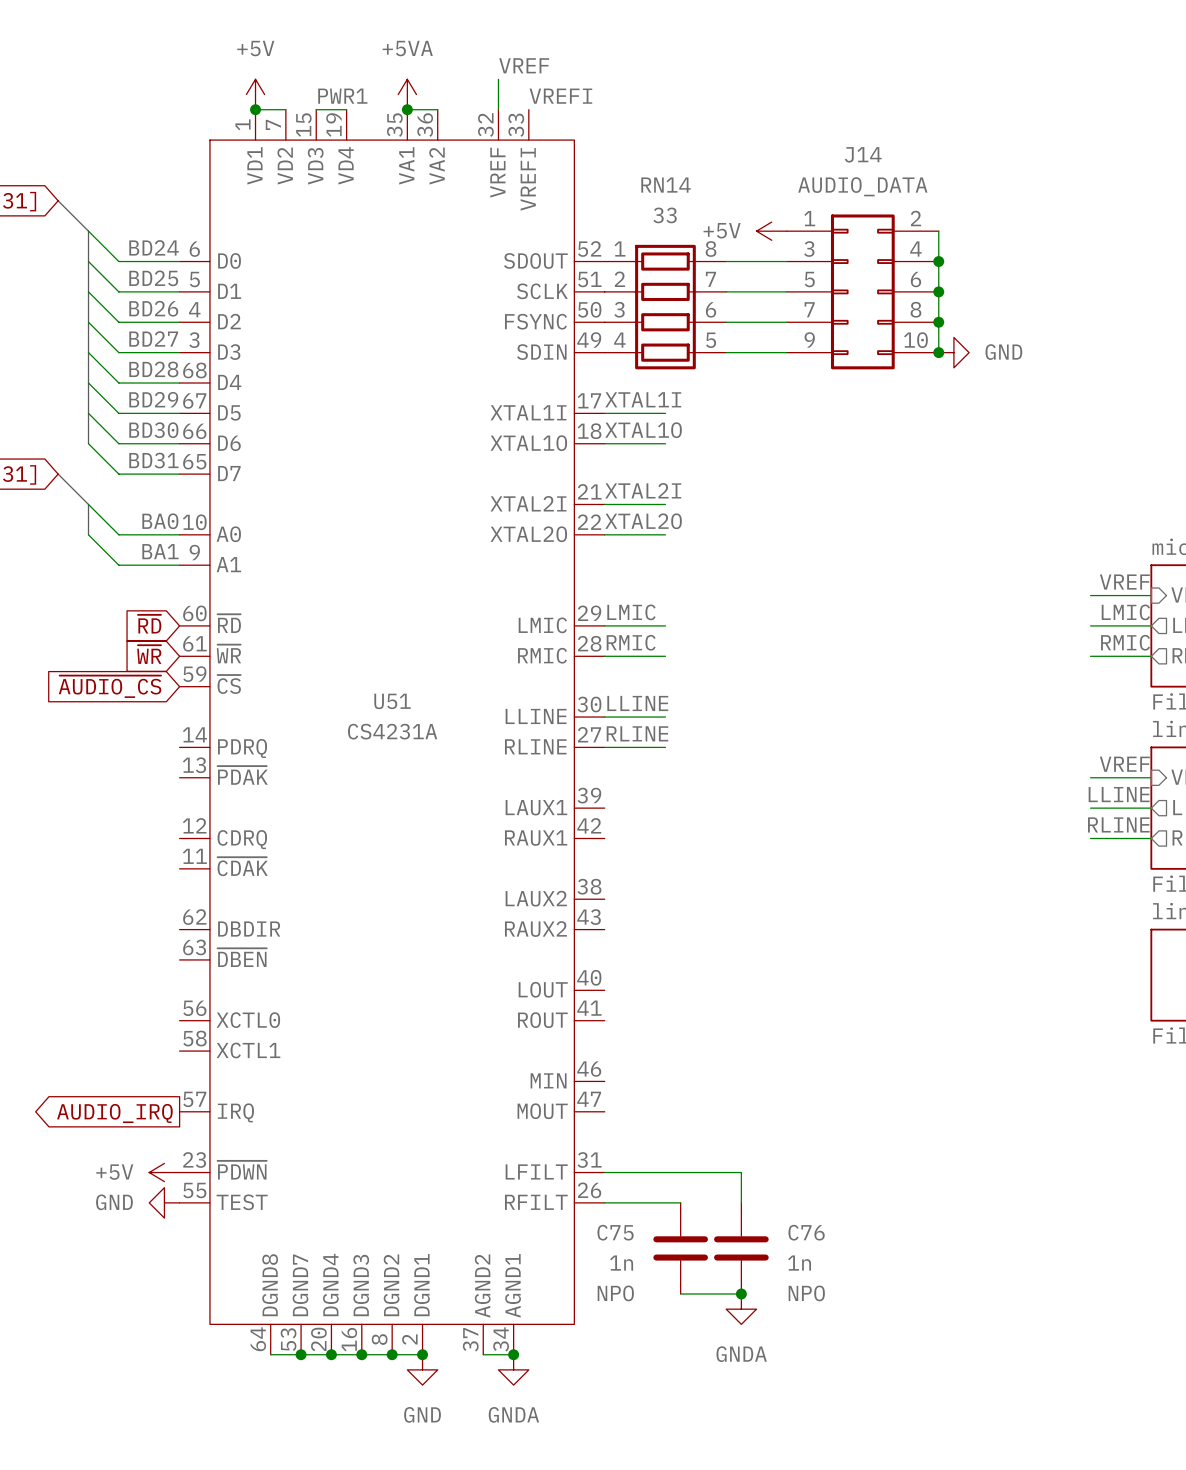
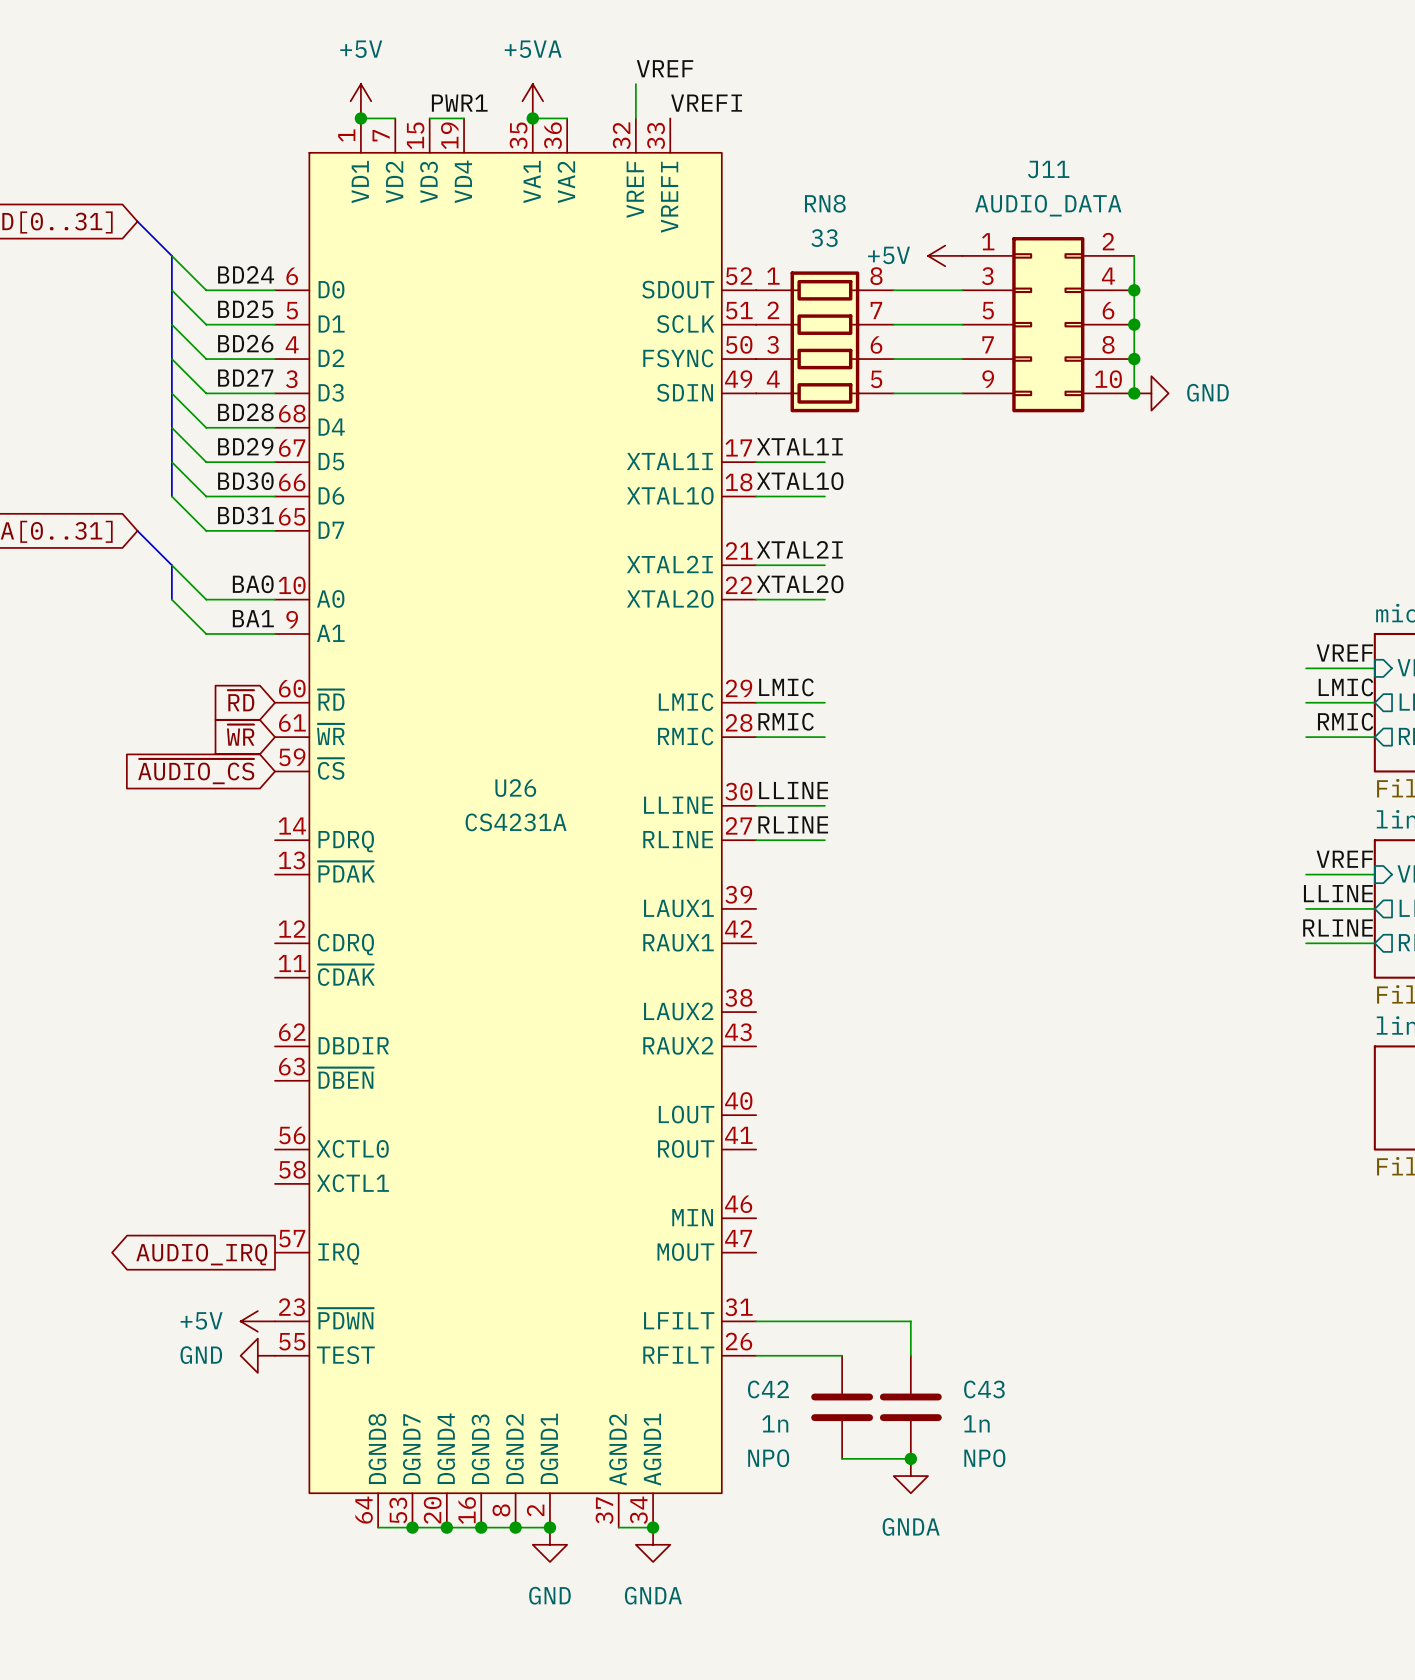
J14 name: J14 (863, 154) -> J11 (1048, 169)
RN14 name: RN14 (666, 185) -> RN8 (825, 203)
U51 name: U51 (392, 701) -> U26 (515, 788)
C75 name: C75 (615, 1232) -> C42 (768, 1389)
C76 name: C76 (806, 1232) -> C43 (984, 1389)

